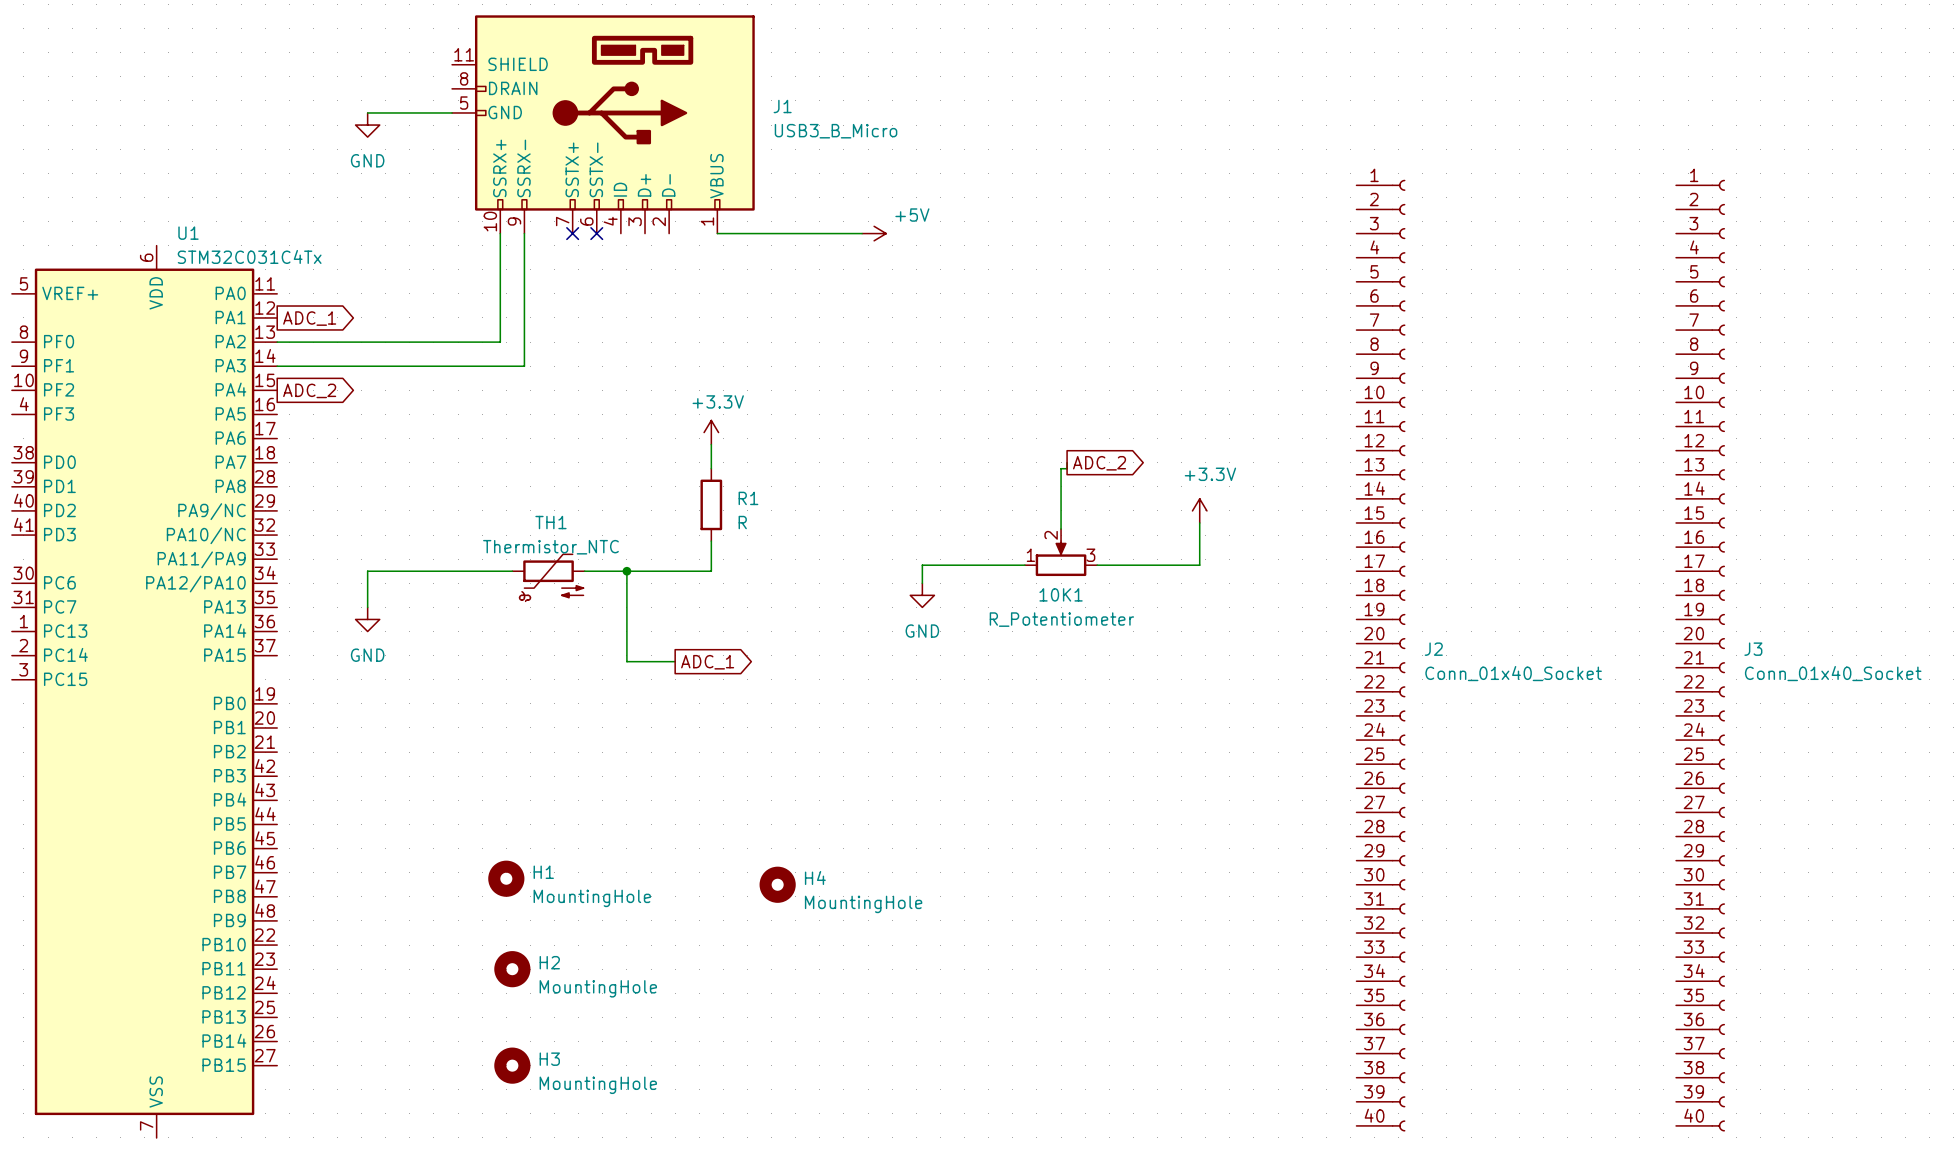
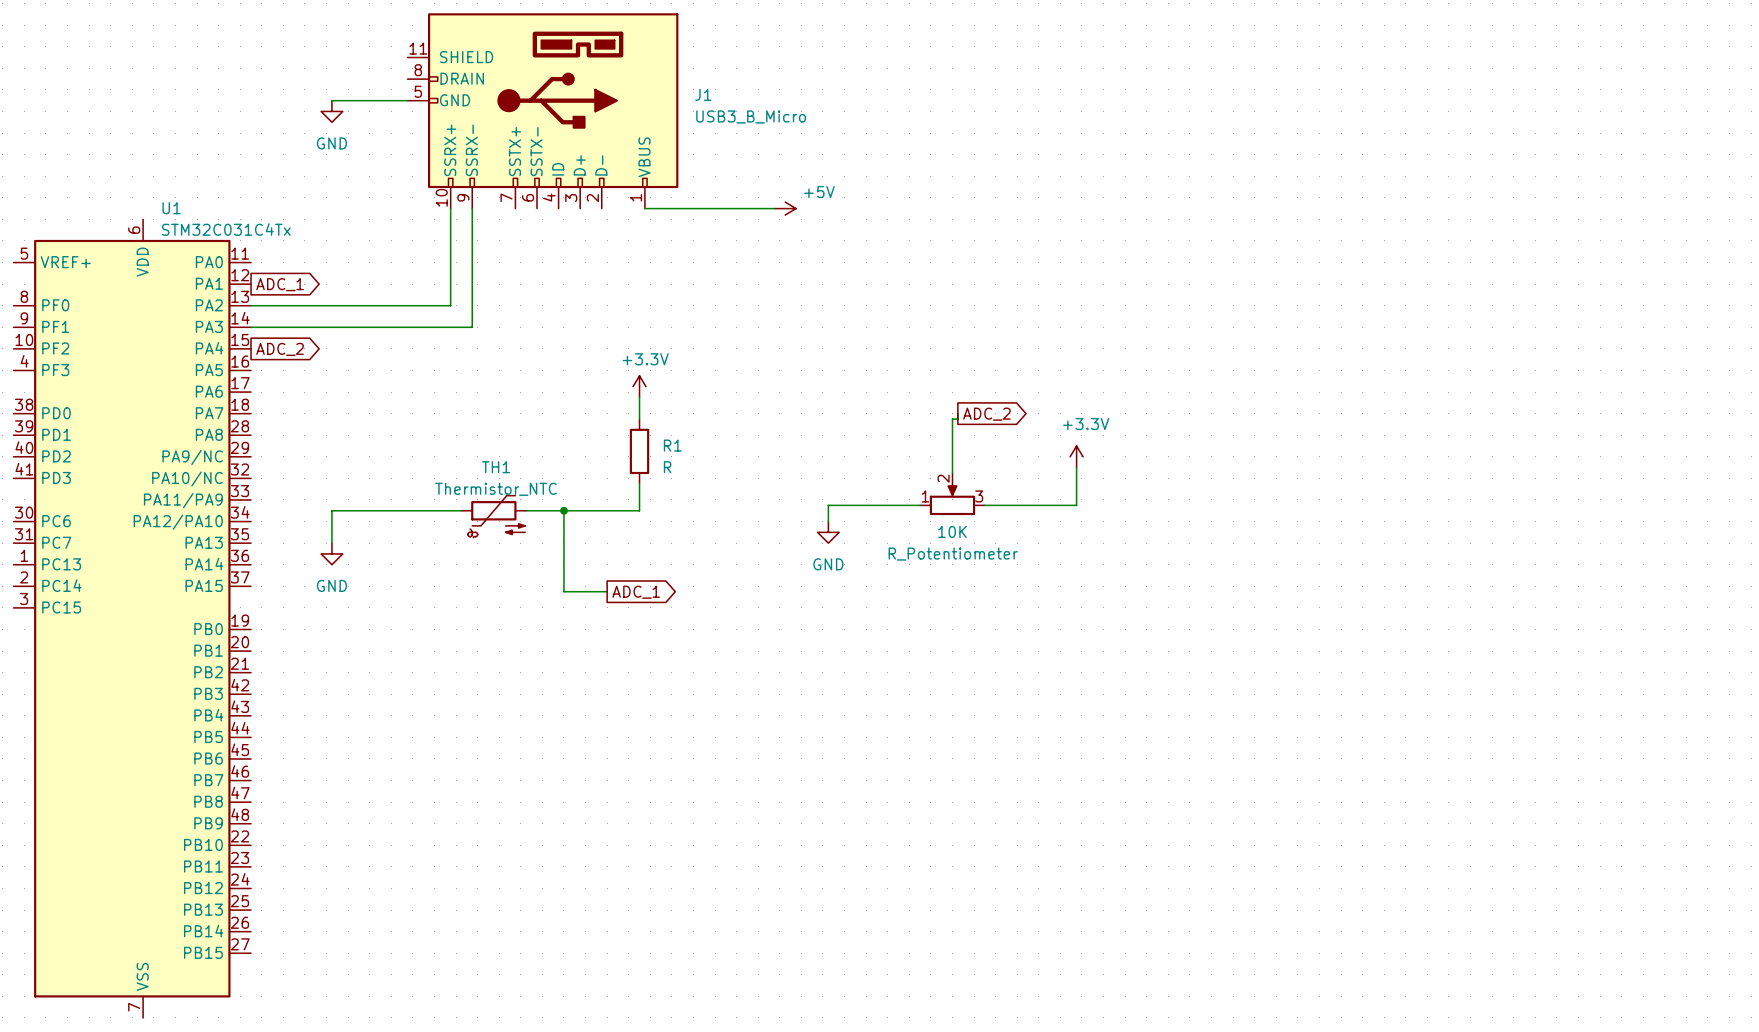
no-connect mark: (572, 233) -> none
no-connect mark: (596, 233) -> none
10K1 name: 10K1 (1061, 594) -> 10K (952, 531)
J2: Conn_01x40_Socket (1380, 655) -> none
J3: Conn_01x40_Socket (1700, 655) -> none
H1: MountingHole (506, 878) -> none
H4: MountingHole (777, 884) -> none
H2: MountingHole (512, 969) -> none
H3: MountingHole (512, 1065) -> none

